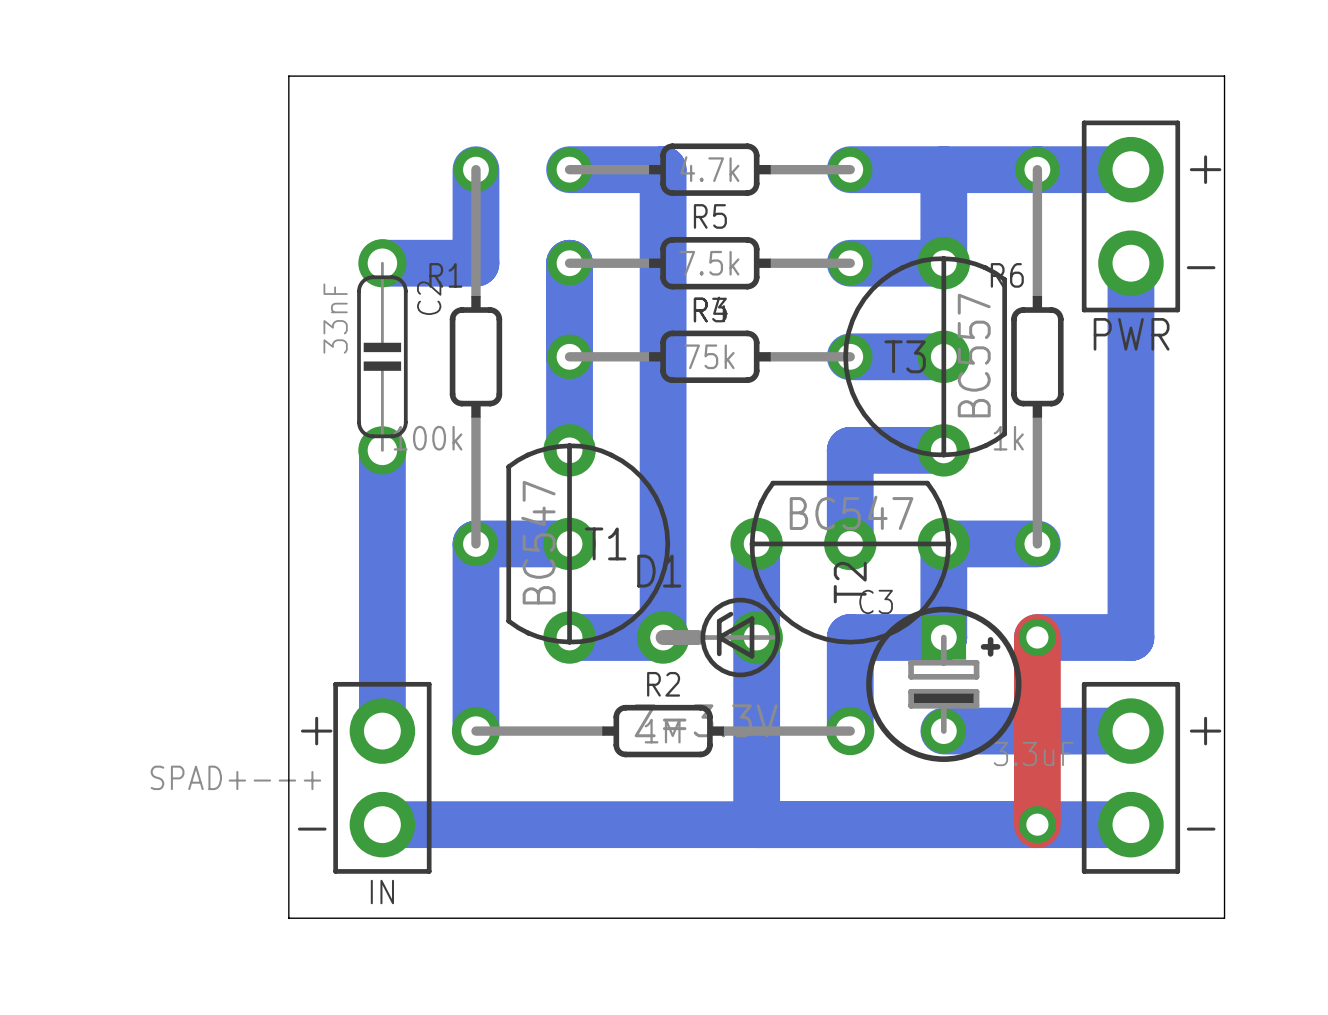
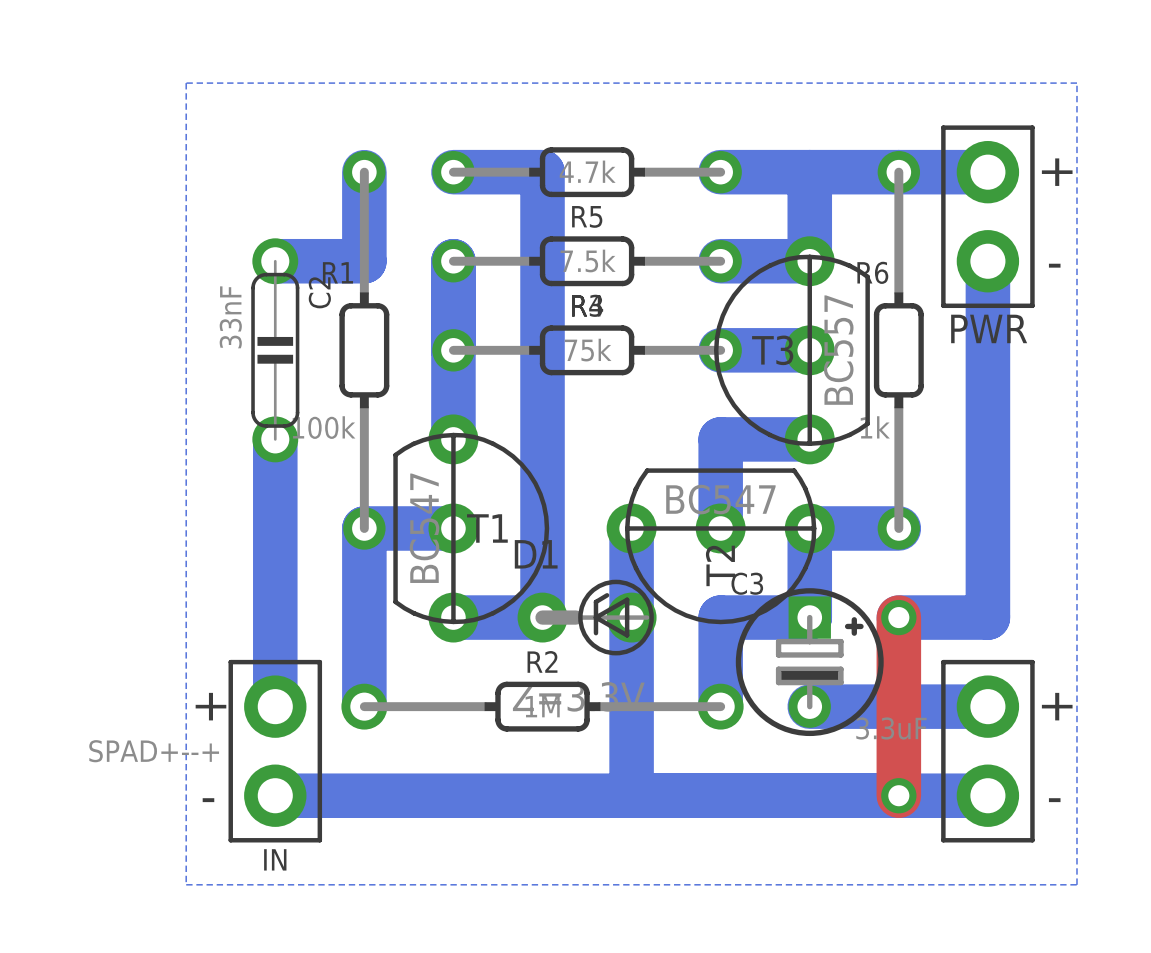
board edge: (288, 76) (1224, 76) (1224, 918) (288, 918) (288, 76) -> none
bottom zone outline: none -> (186, 83) (186, 884) (1076, 884) (1076, 83) (186, 83)

